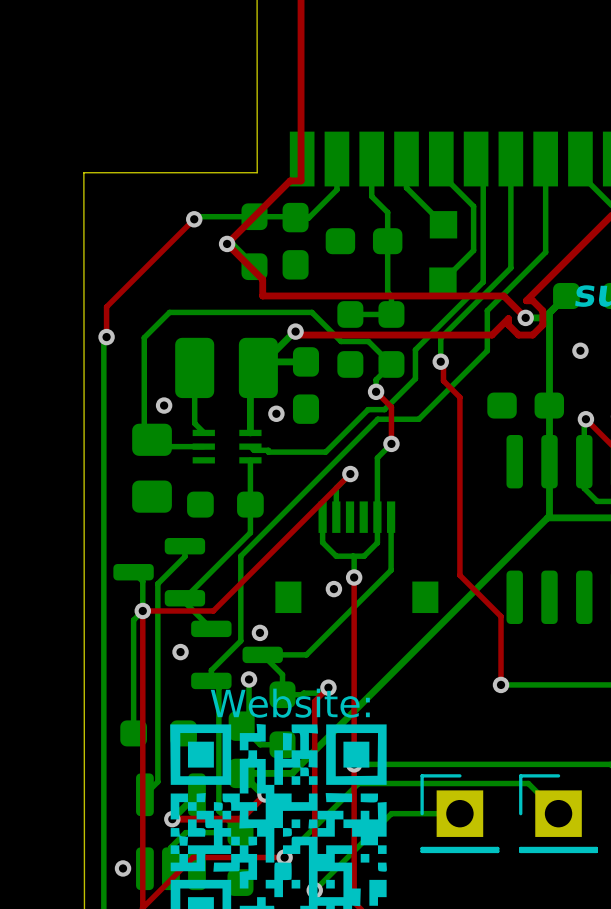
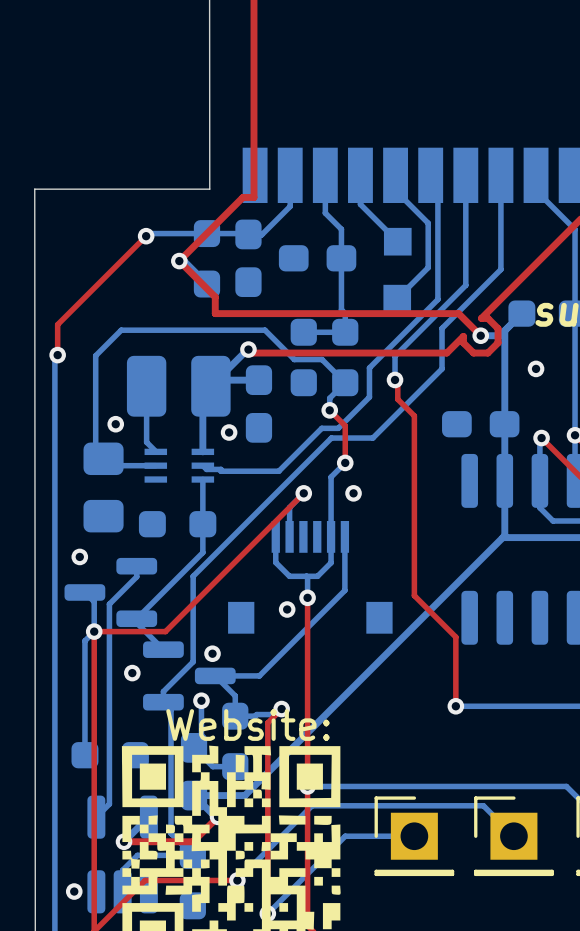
via: none -> (353, 493)
via: none -> (79, 556)

